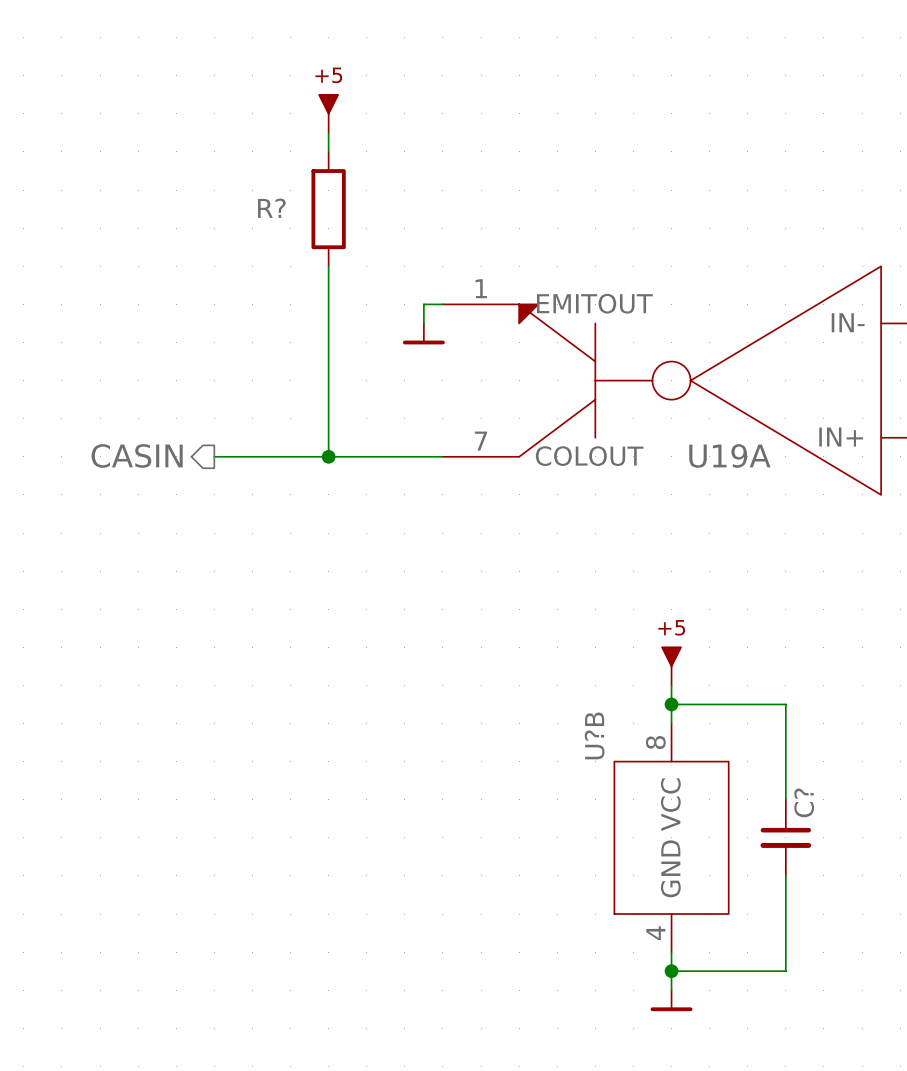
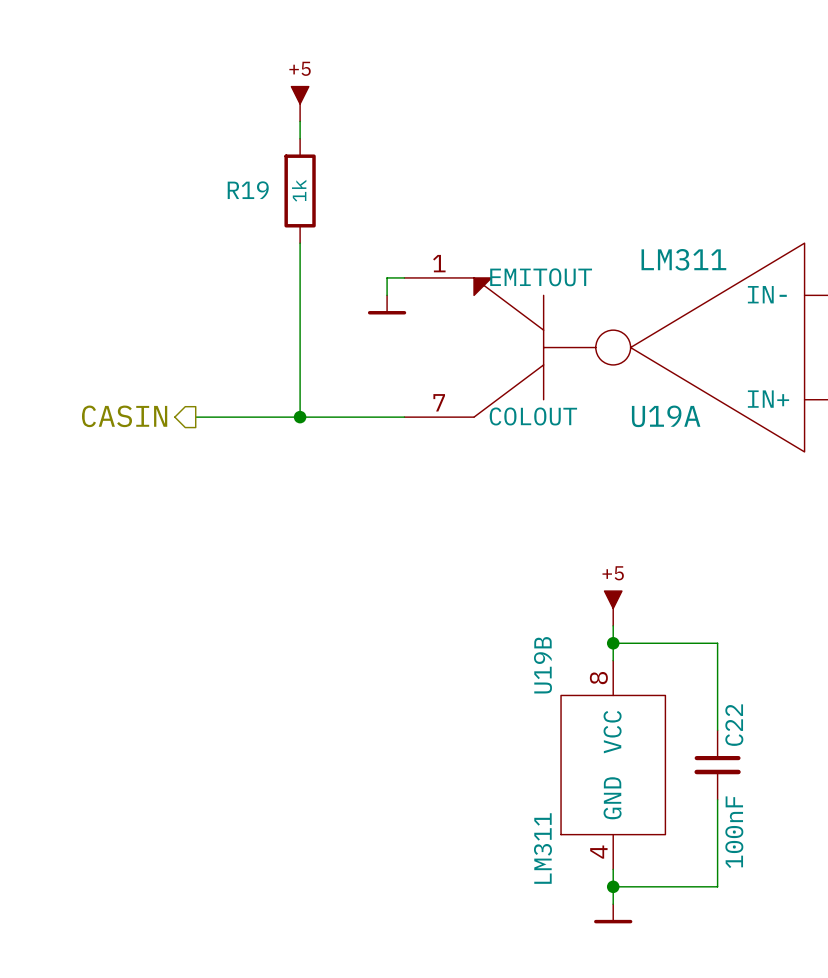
R? name: R? (271, 208) -> R19 (248, 190)
R? value: none -> 1k (299, 190)
U19A value: none -> LM311 (683, 259)
U?B name: U?B (594, 735) -> U19B (542, 665)
C? name: C? (804, 802) -> C22 (734, 725)
C? value: none -> 100nF (734, 832)
U?B value: none -> LM311 (542, 848)

